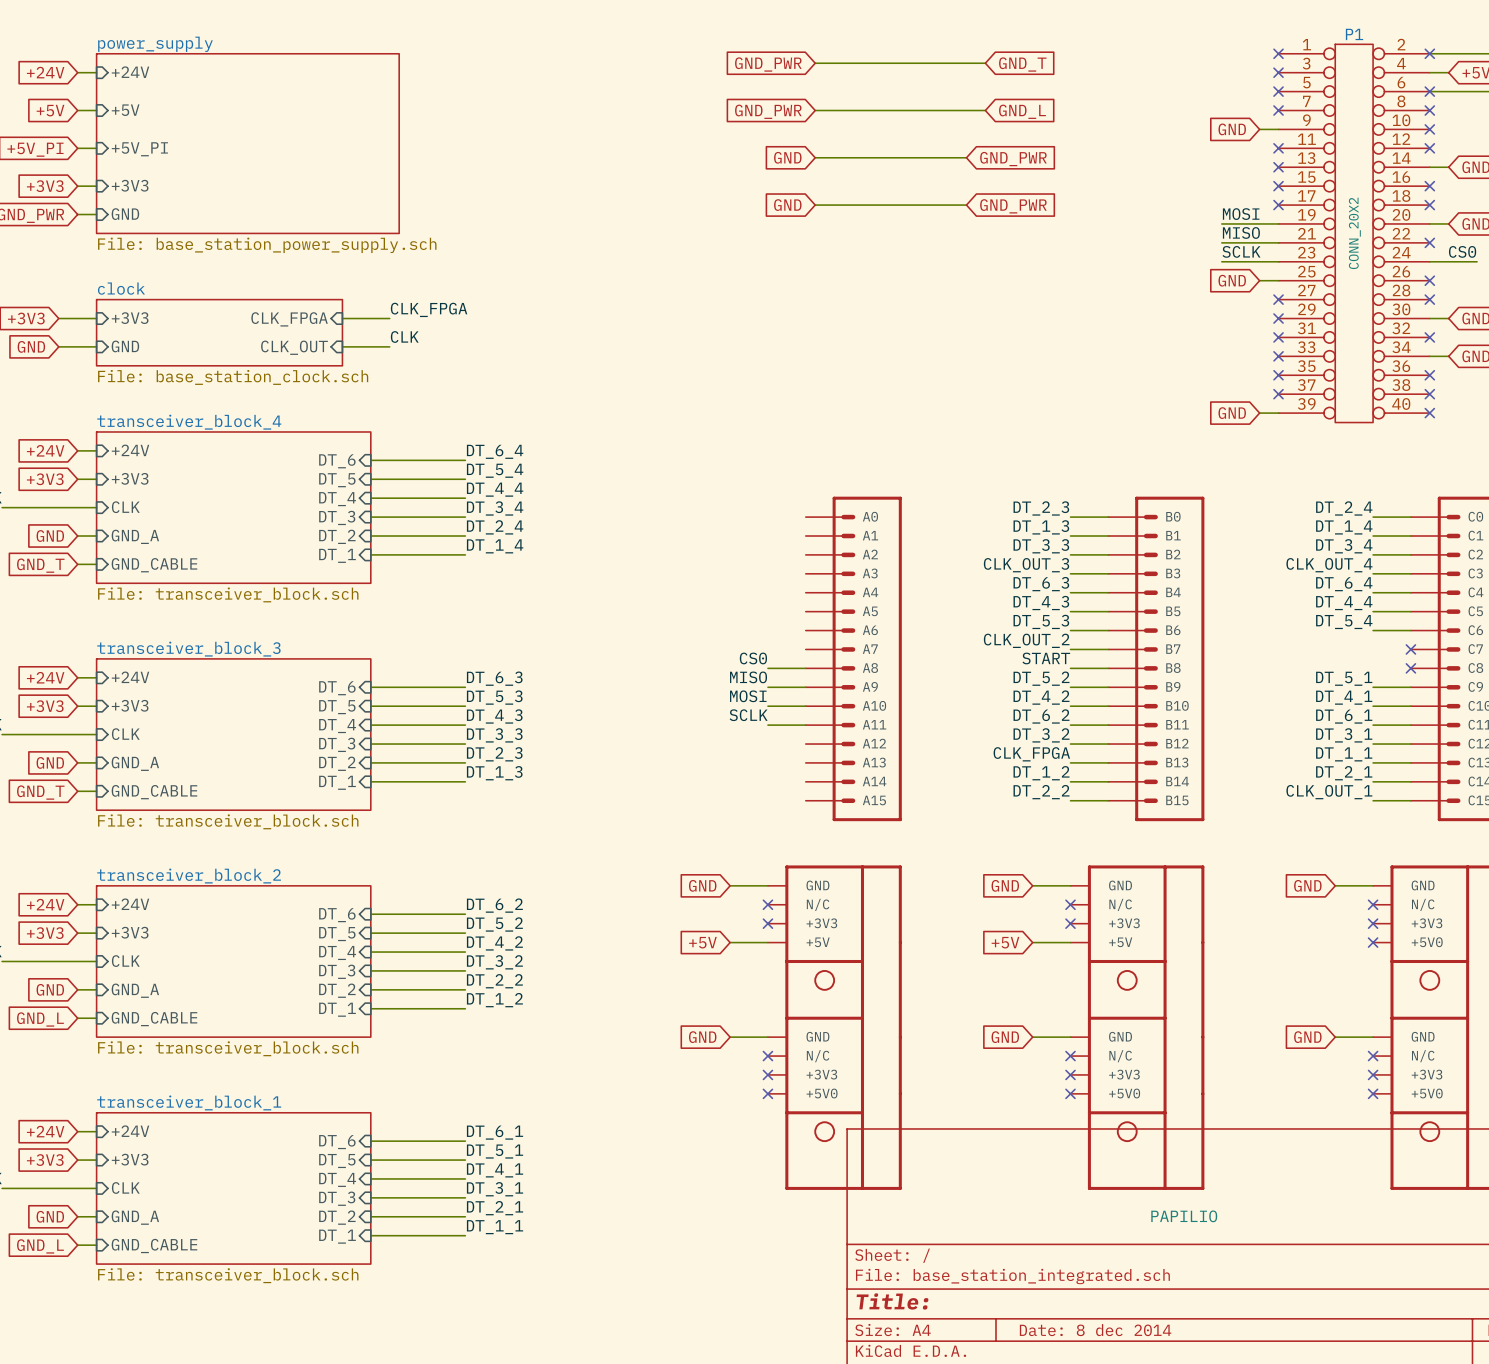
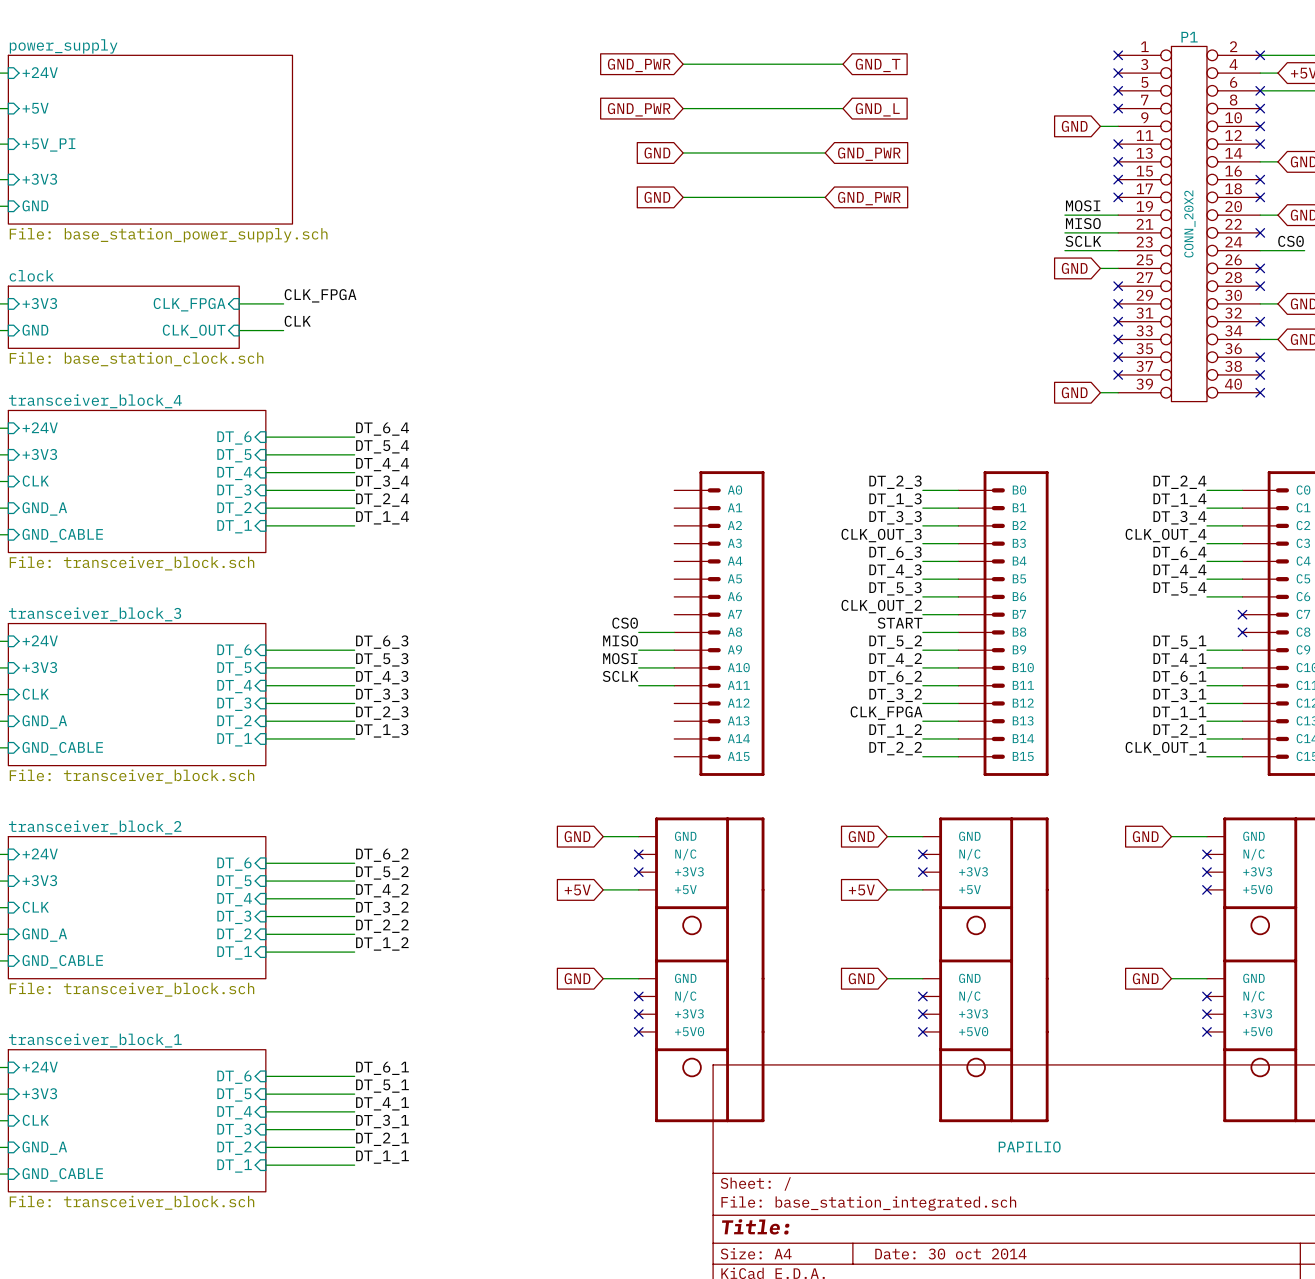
title block: Date: 8 dec 2014 (1095, 1330) -> Date: 30 oct 2014 (950, 1254)

